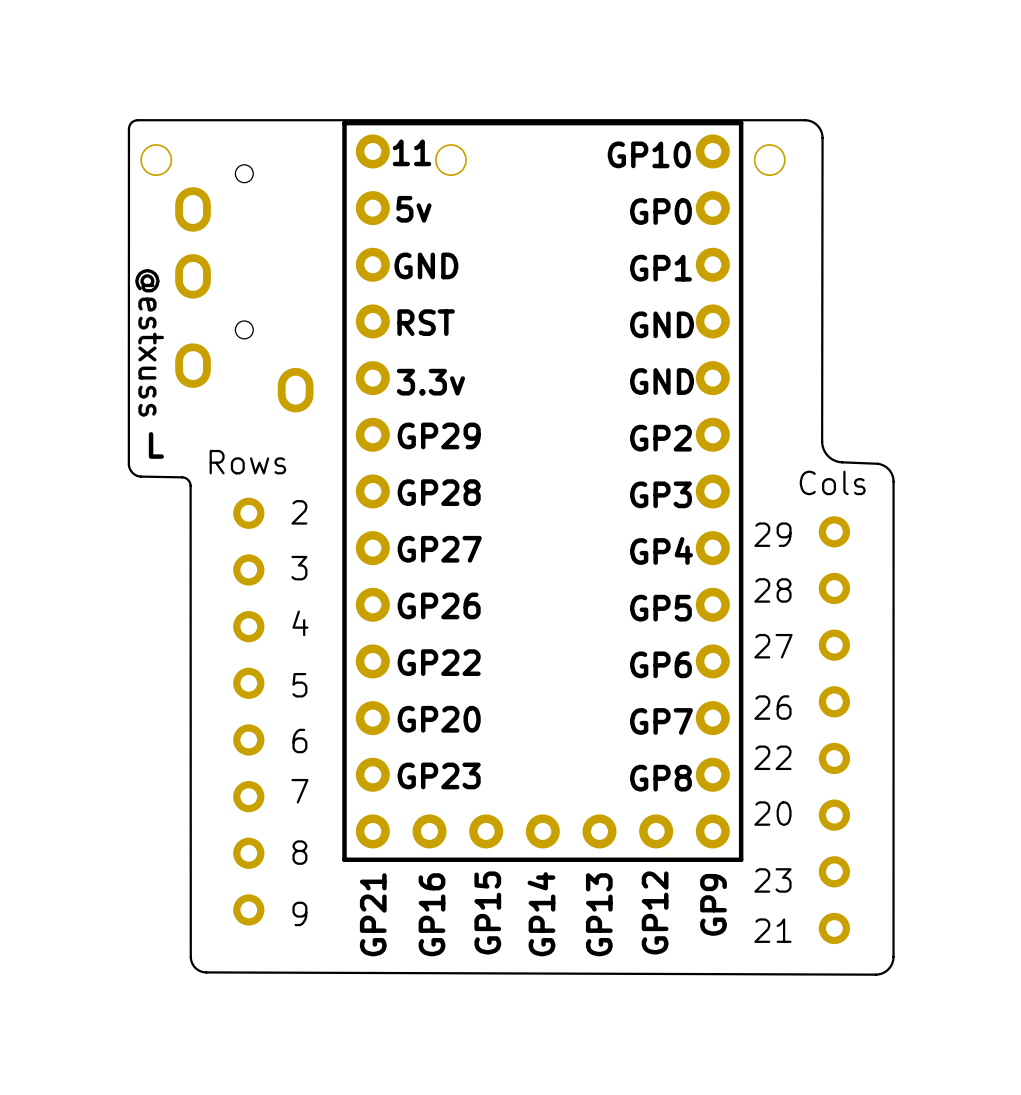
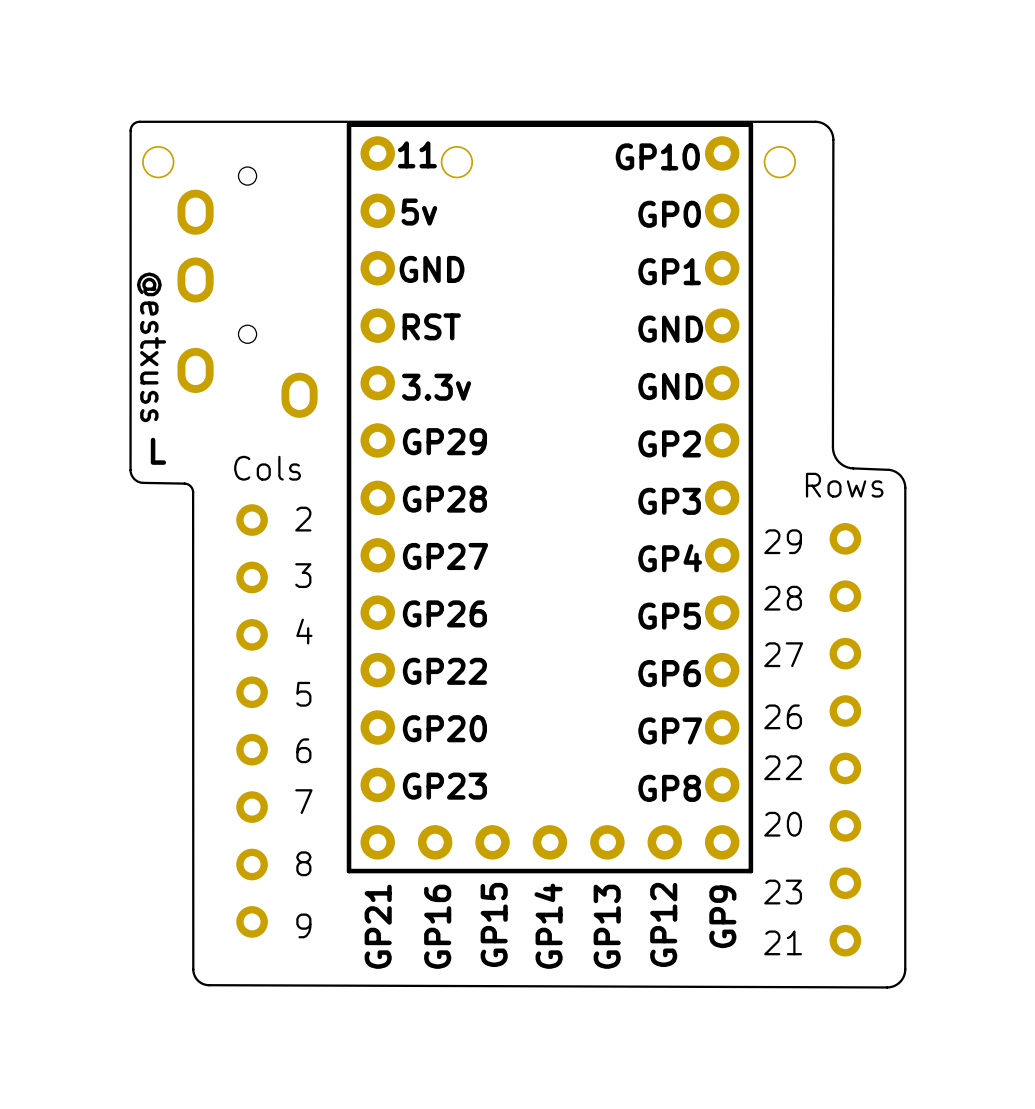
text: Rows (247, 462) -> none
text: none -> Cols (267, 468)
text: Cols (832, 482) -> Rows (844, 485)

